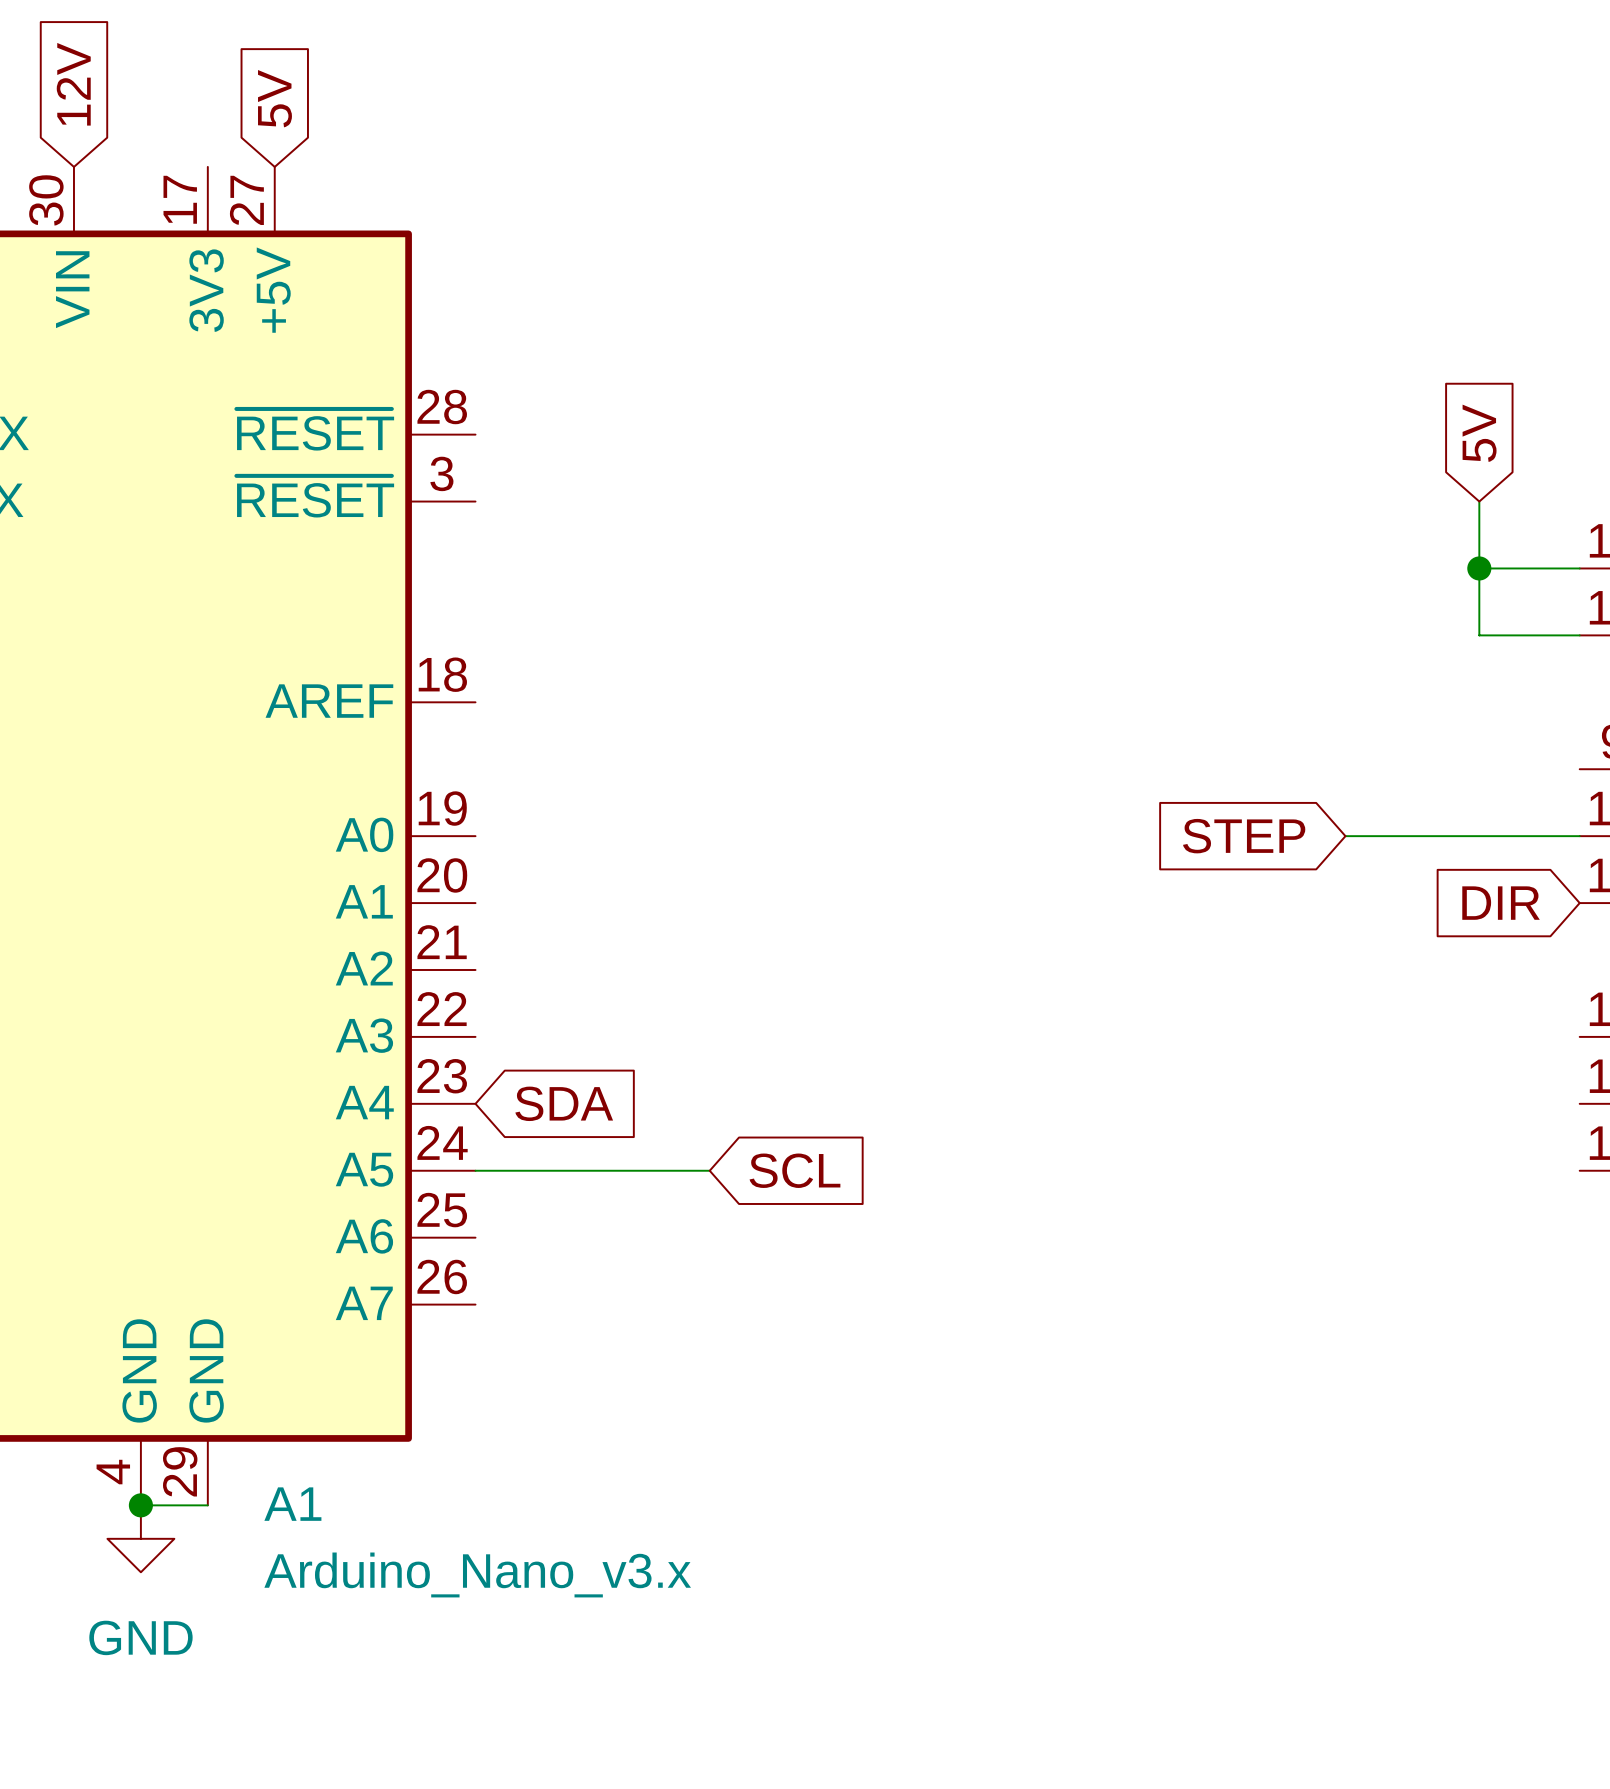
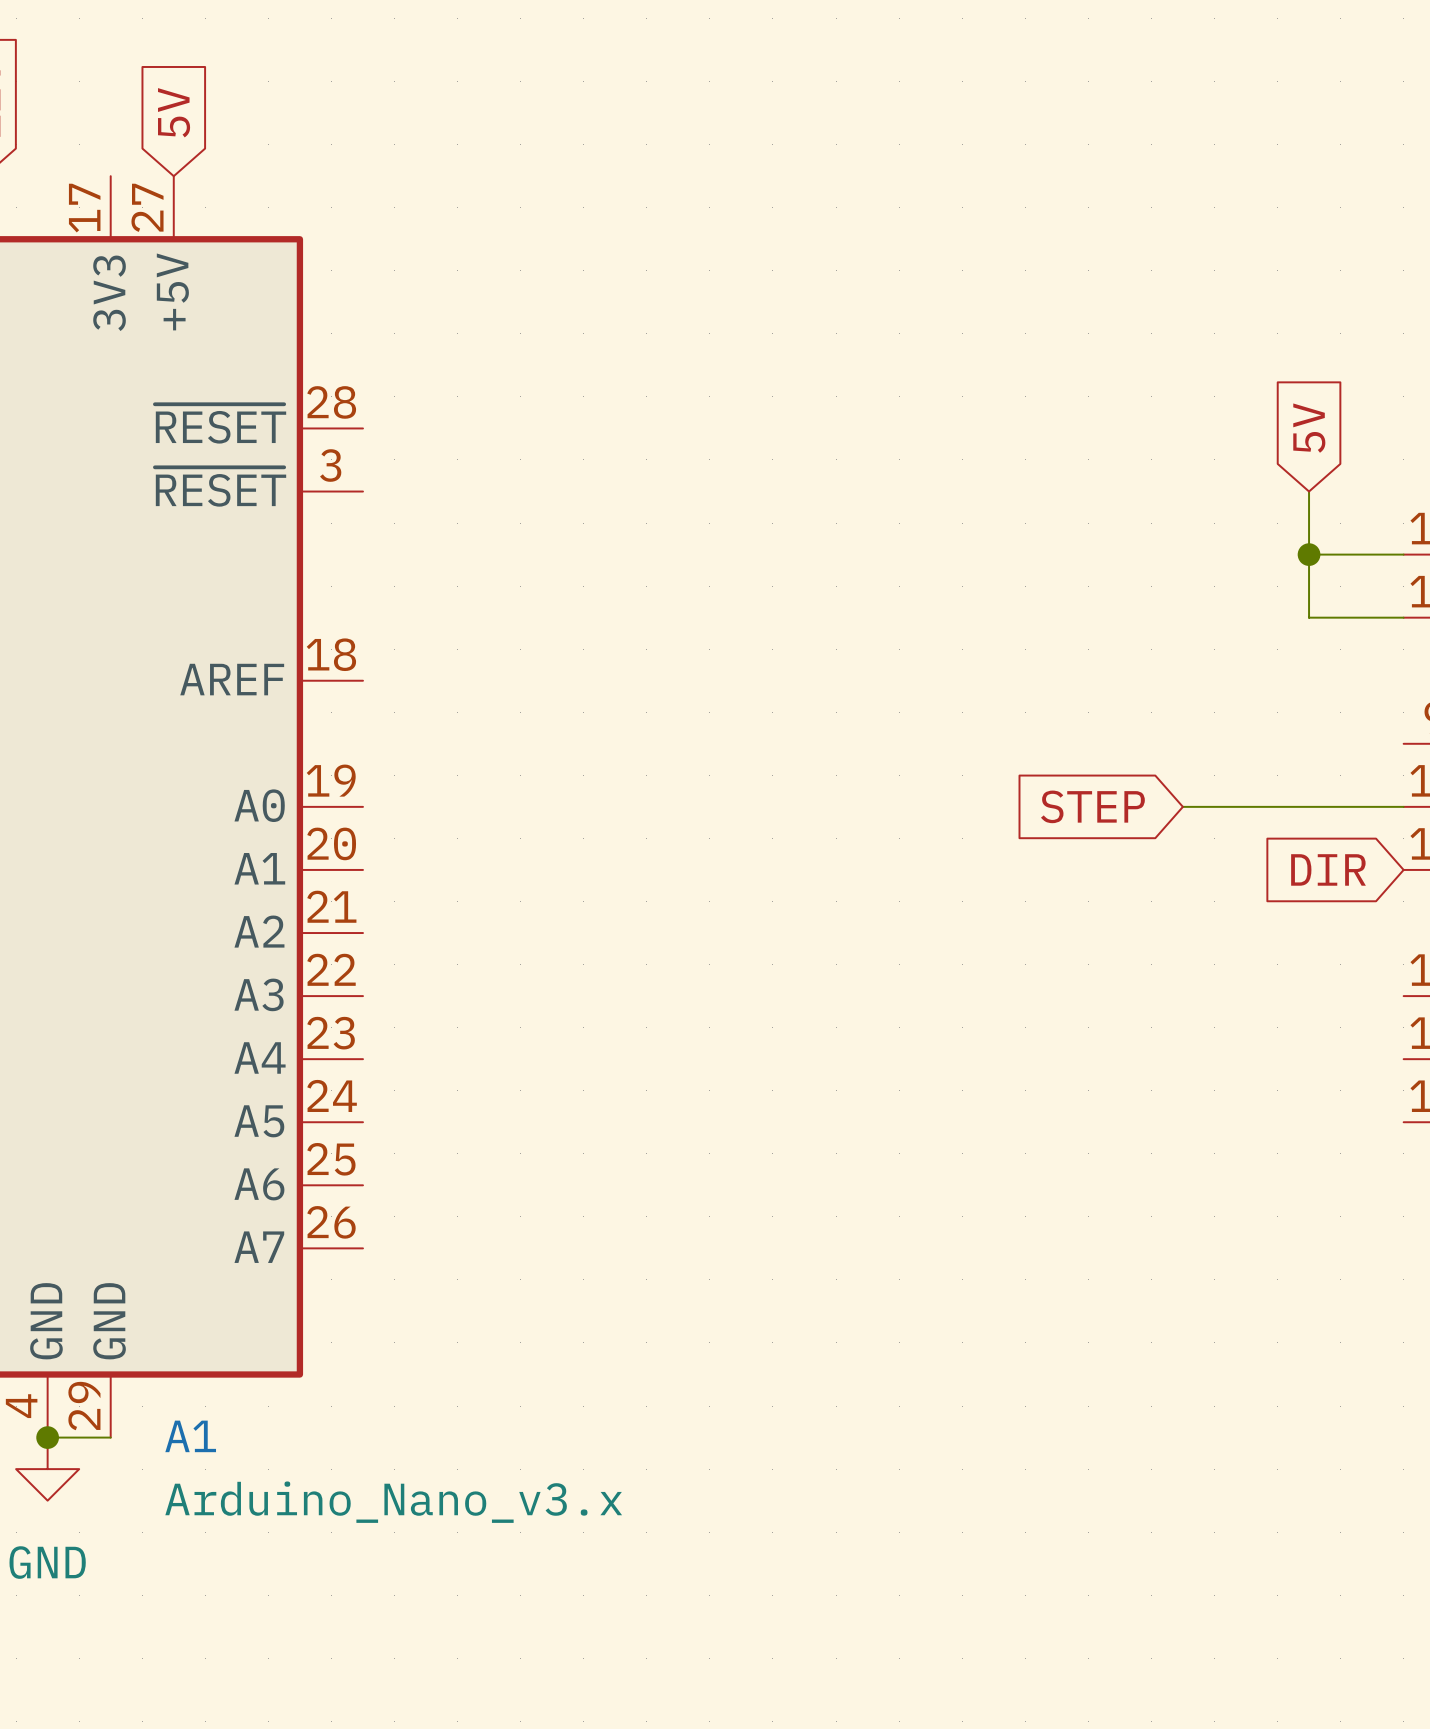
global label: SDA (564, 1103) -> none
wire: (475, 1170) (709, 1170) -> none
global label: SCL (794, 1170) -> none

